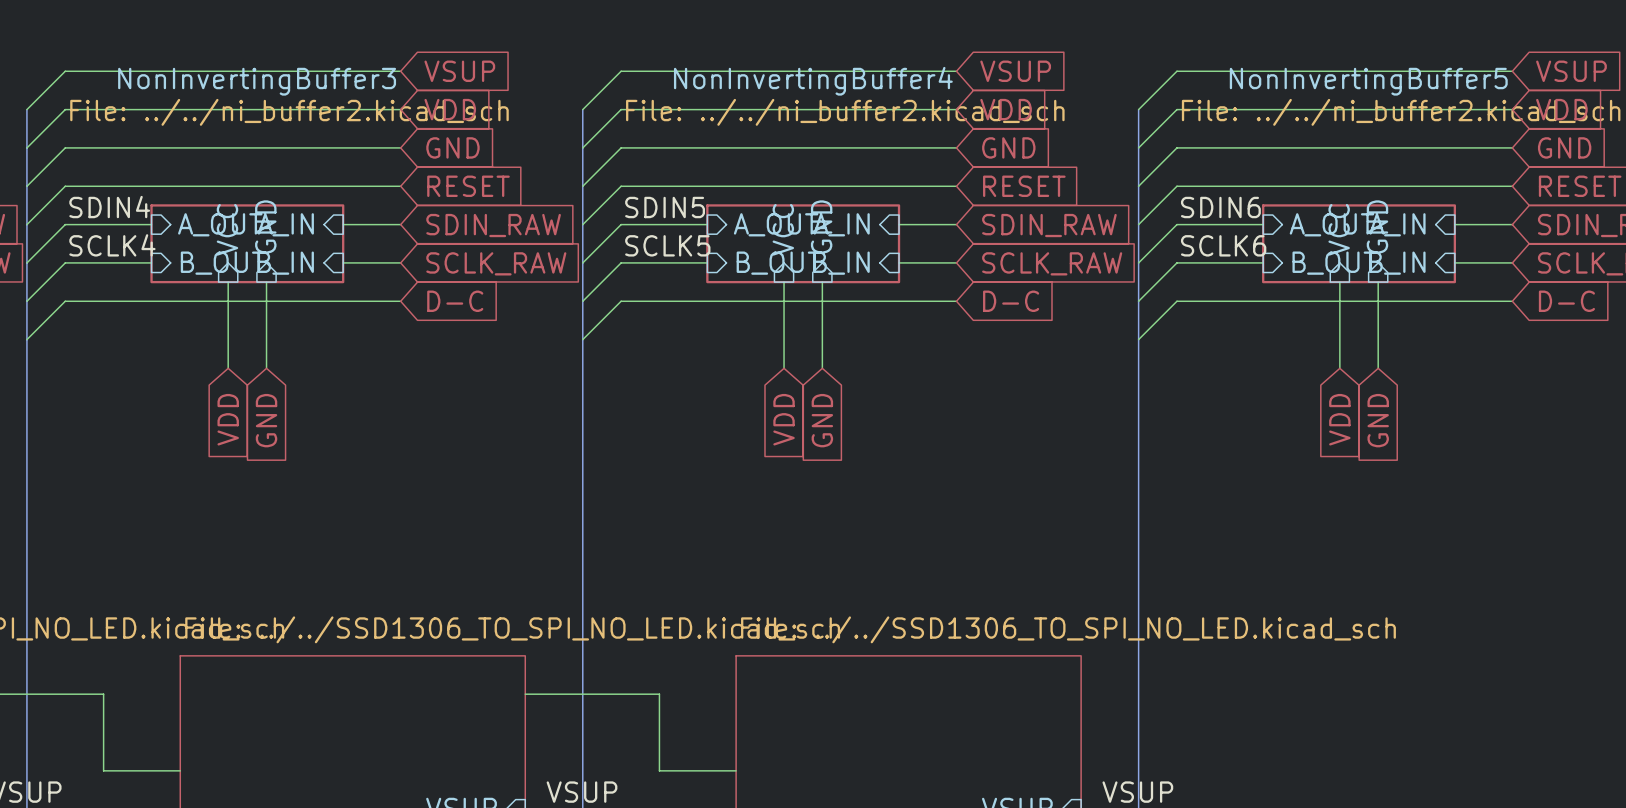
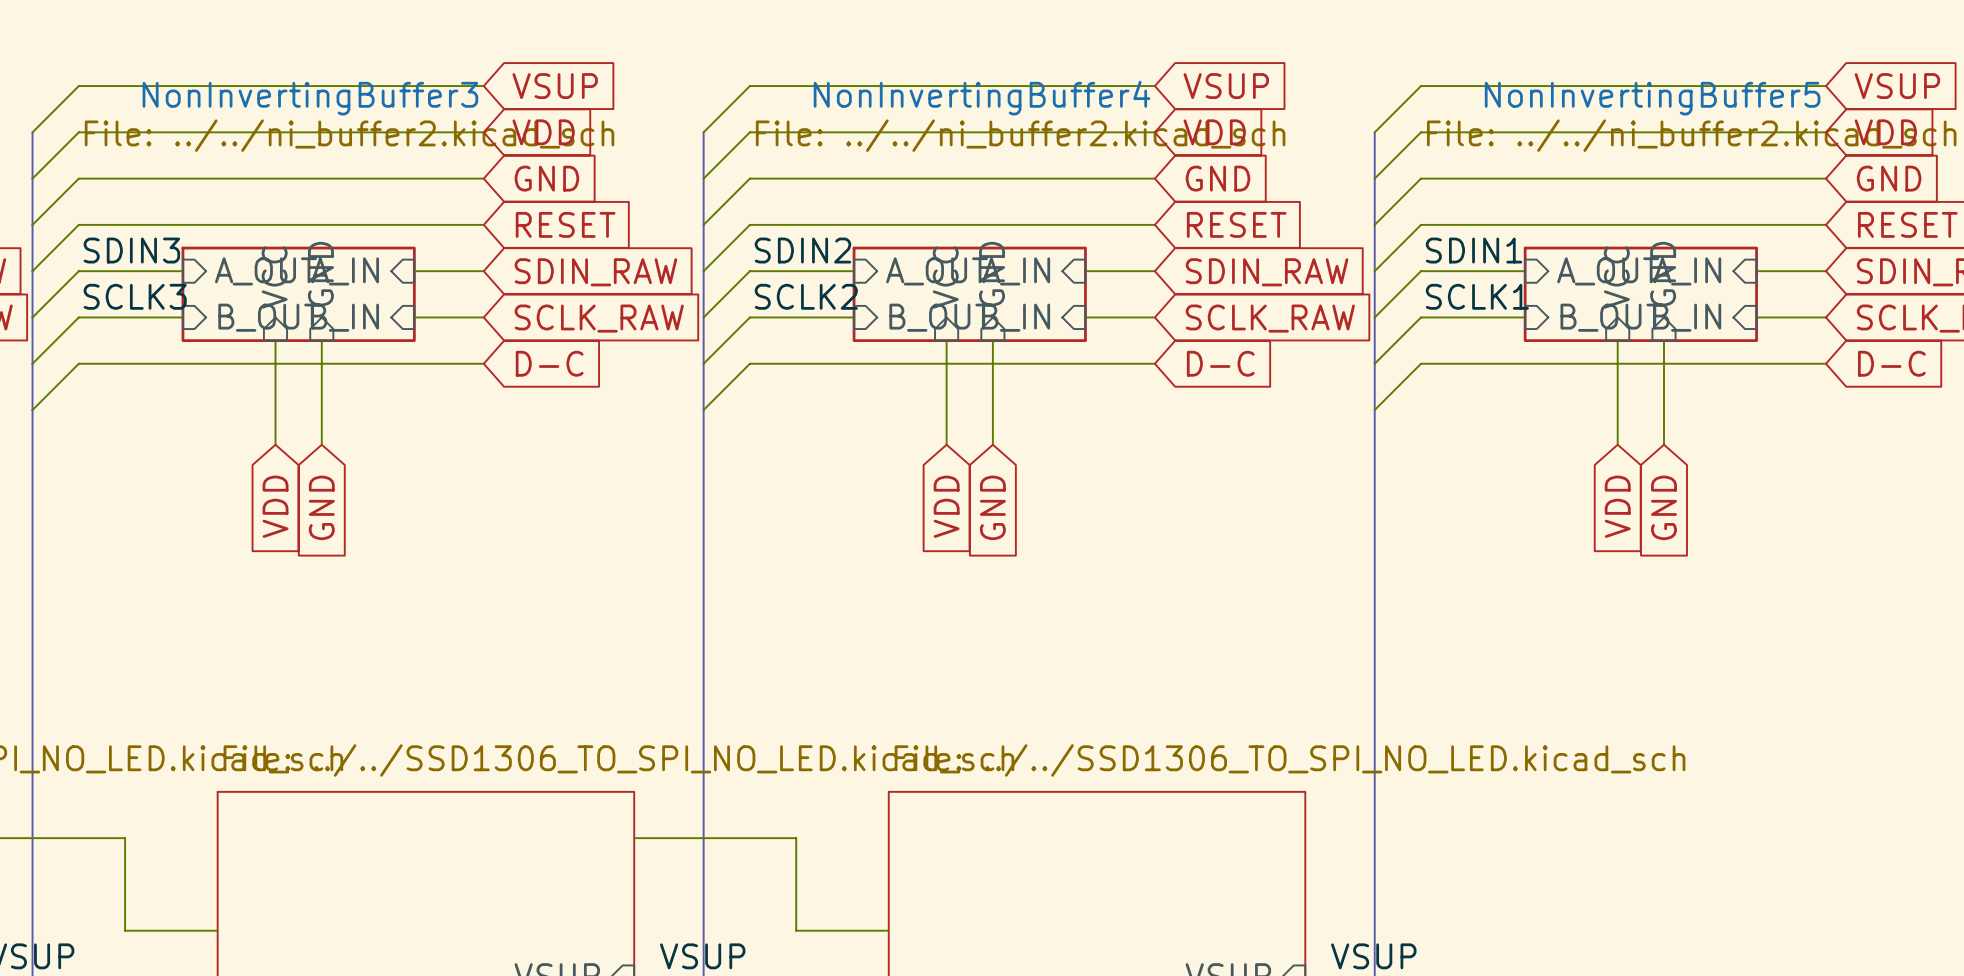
label: SDIN4 (109, 207) -> SDIN3 (131, 250)
label: SDIN5 (665, 207) -> SDIN2 (802, 250)
label: SDIN6 (1220, 207) -> SDIN1 (1474, 250)
label: SCLK4 (112, 245) -> SCLK3 (135, 296)
label: SCLK5 (667, 245) -> SCLK2 (806, 296)
label: SCLK6 (1223, 245) -> SCLK1 (1477, 296)

